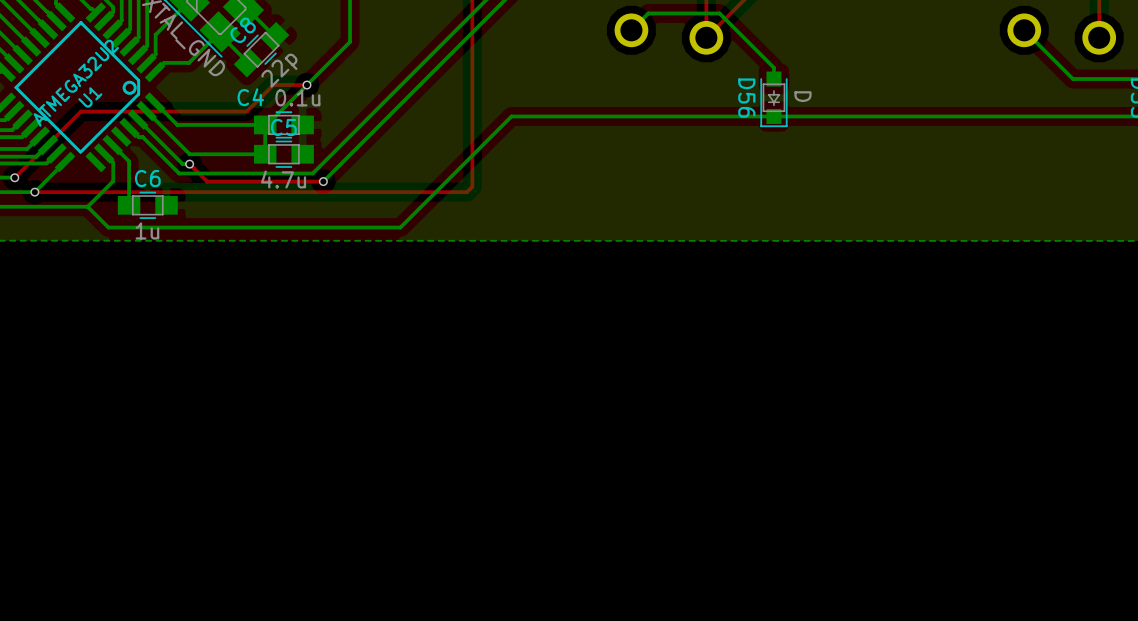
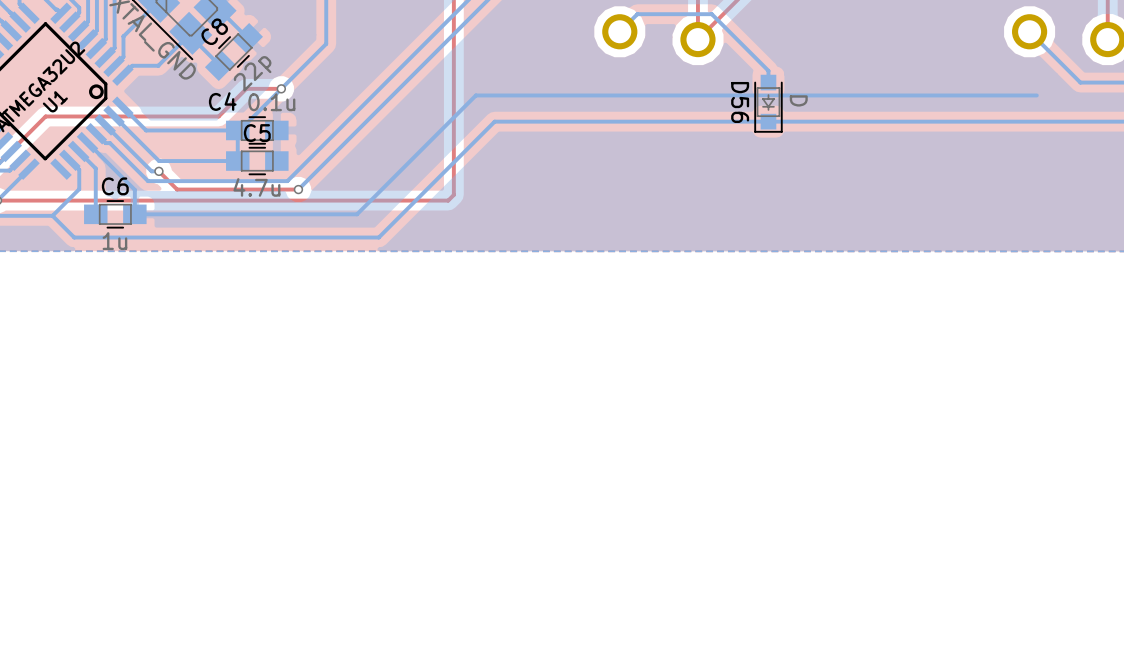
bottom track: none -> (1036, 95) (475, 95) (357, 214) (134, 214) (134, 189) (87, 142)

